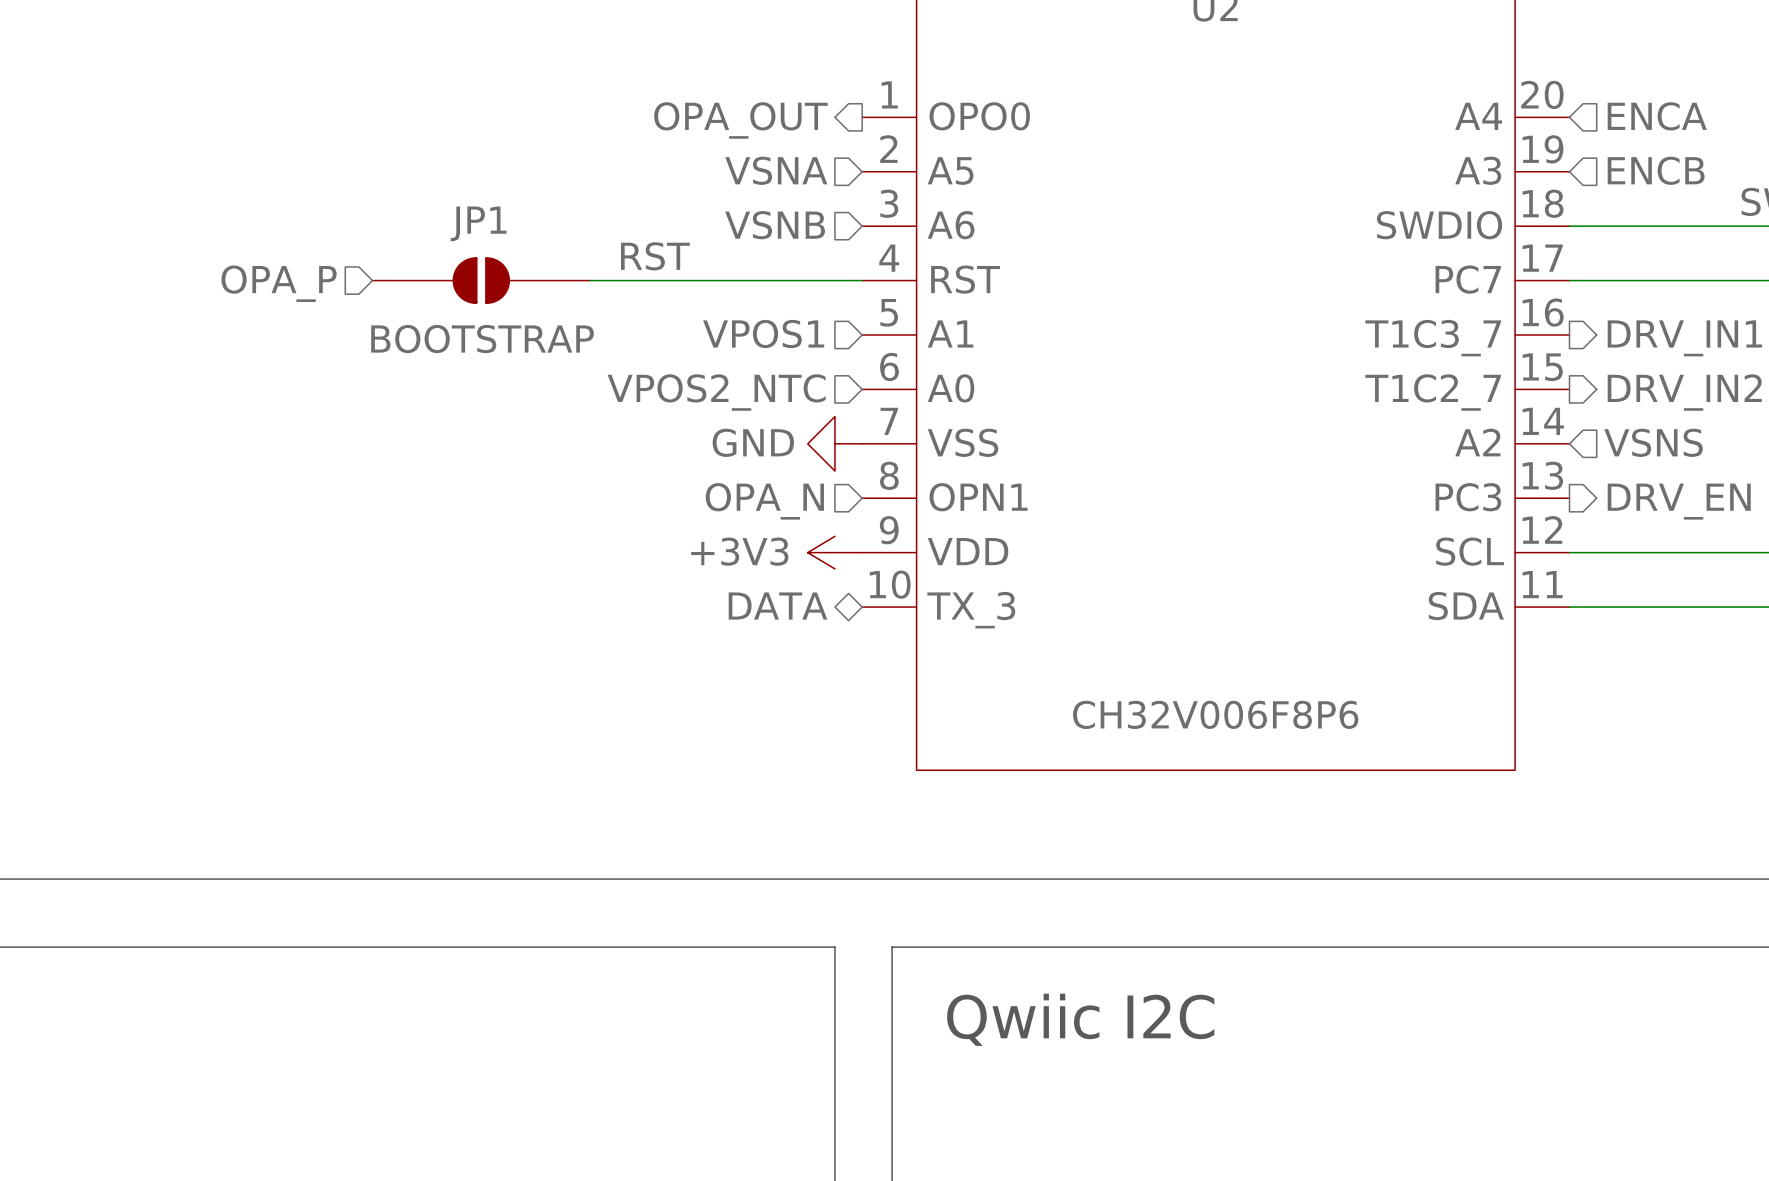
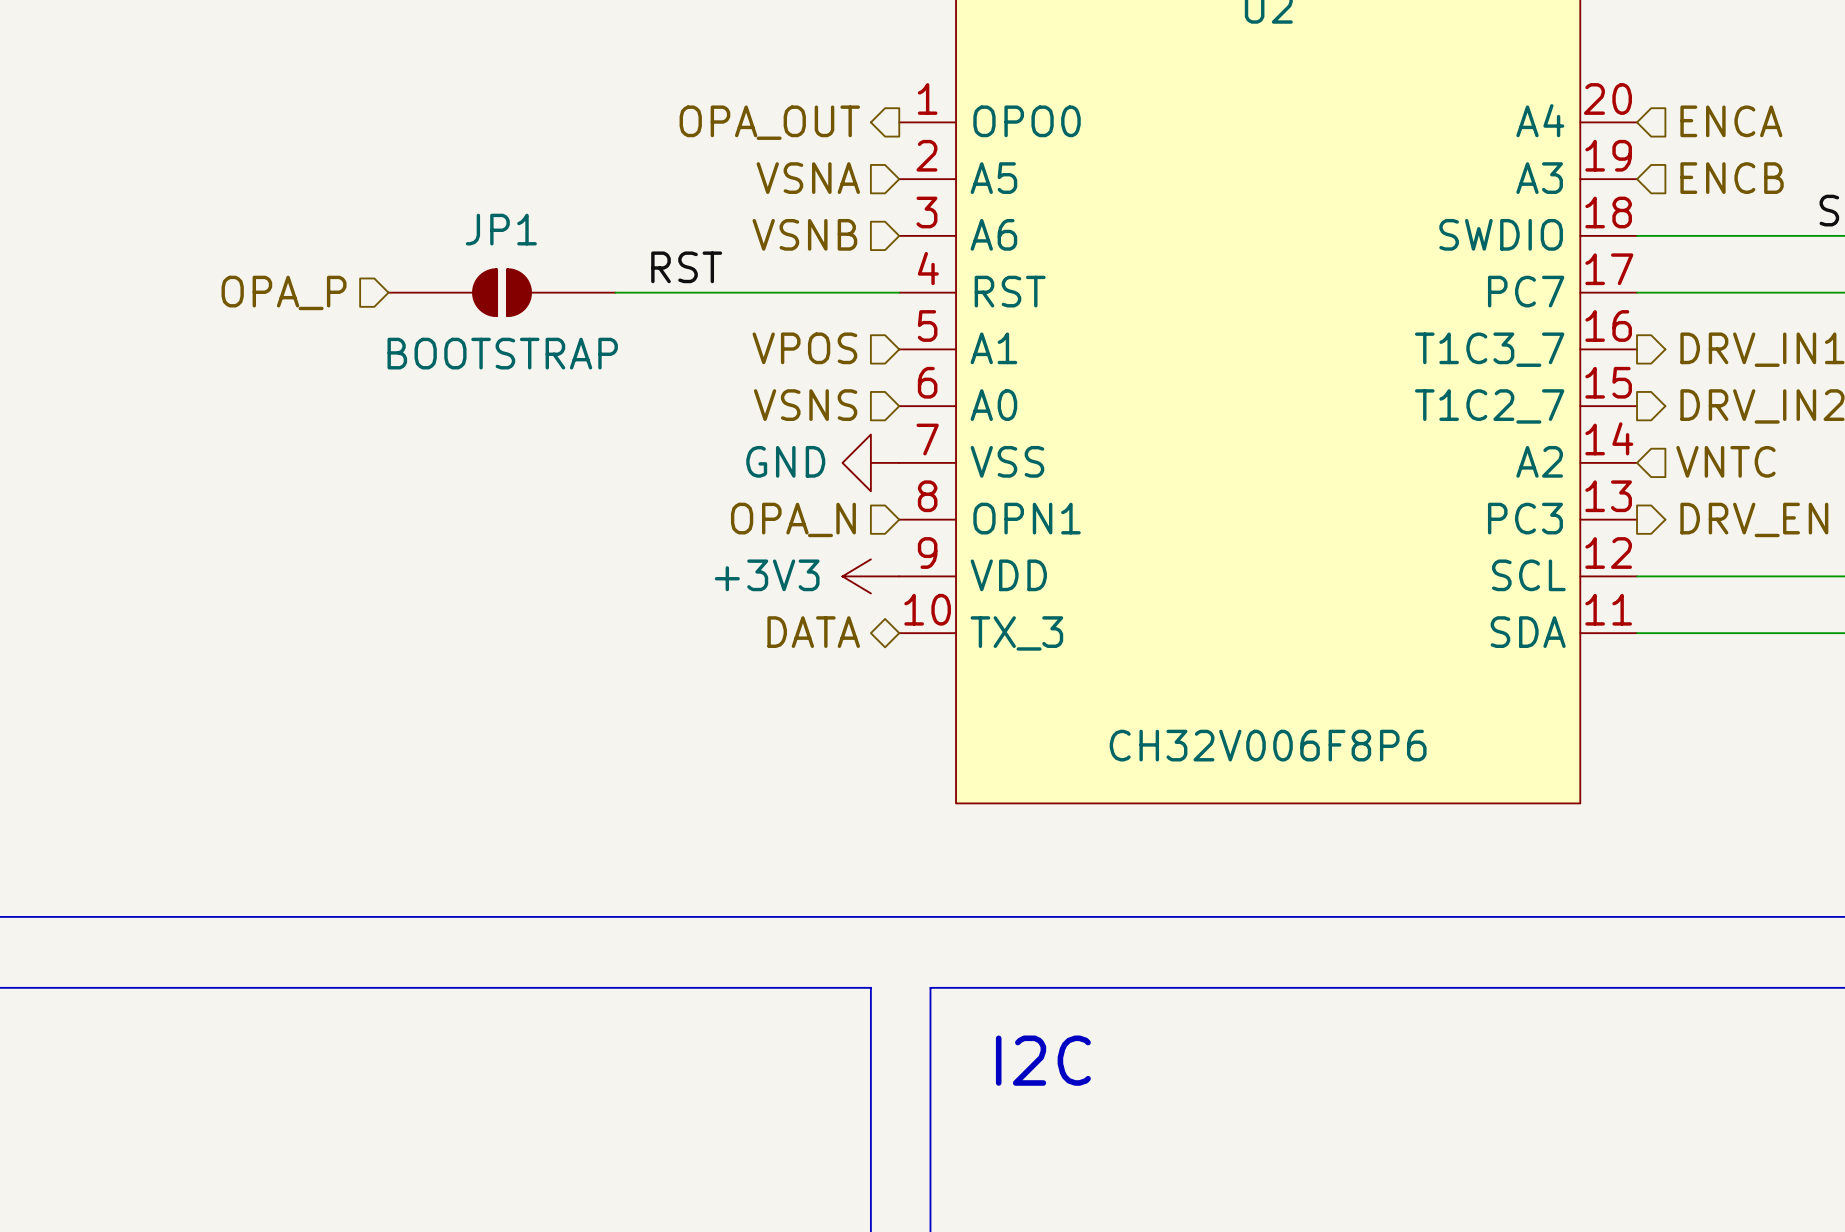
hierarchical label: VPOS1 (763, 333) -> VPOS (804, 348)
hierarchical label: VPOS2_NTC (716, 392) -> VSNS (805, 405)
hierarchical label: VSNS (1653, 442) -> VNTC (1725, 461)
text: Qwiic I2C (1080, 1019) -> I2C (1043, 1060)

